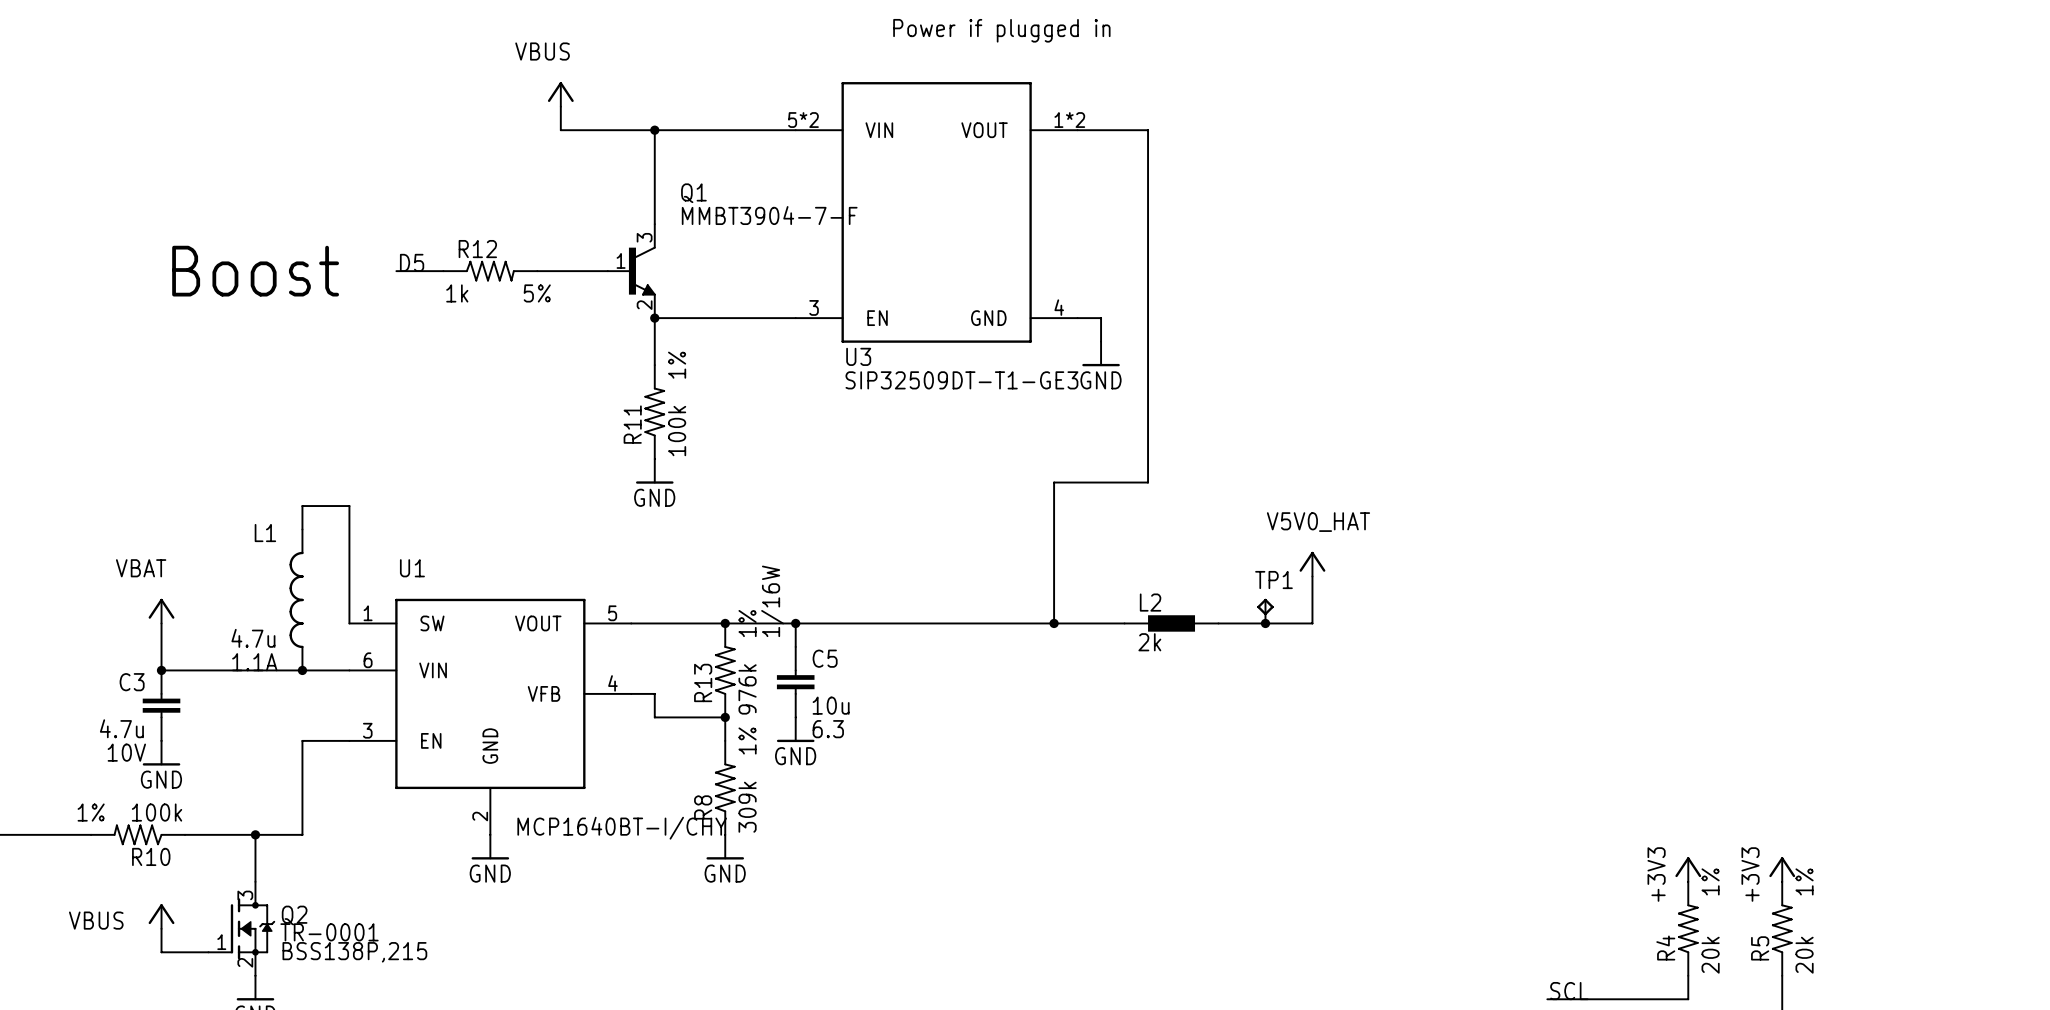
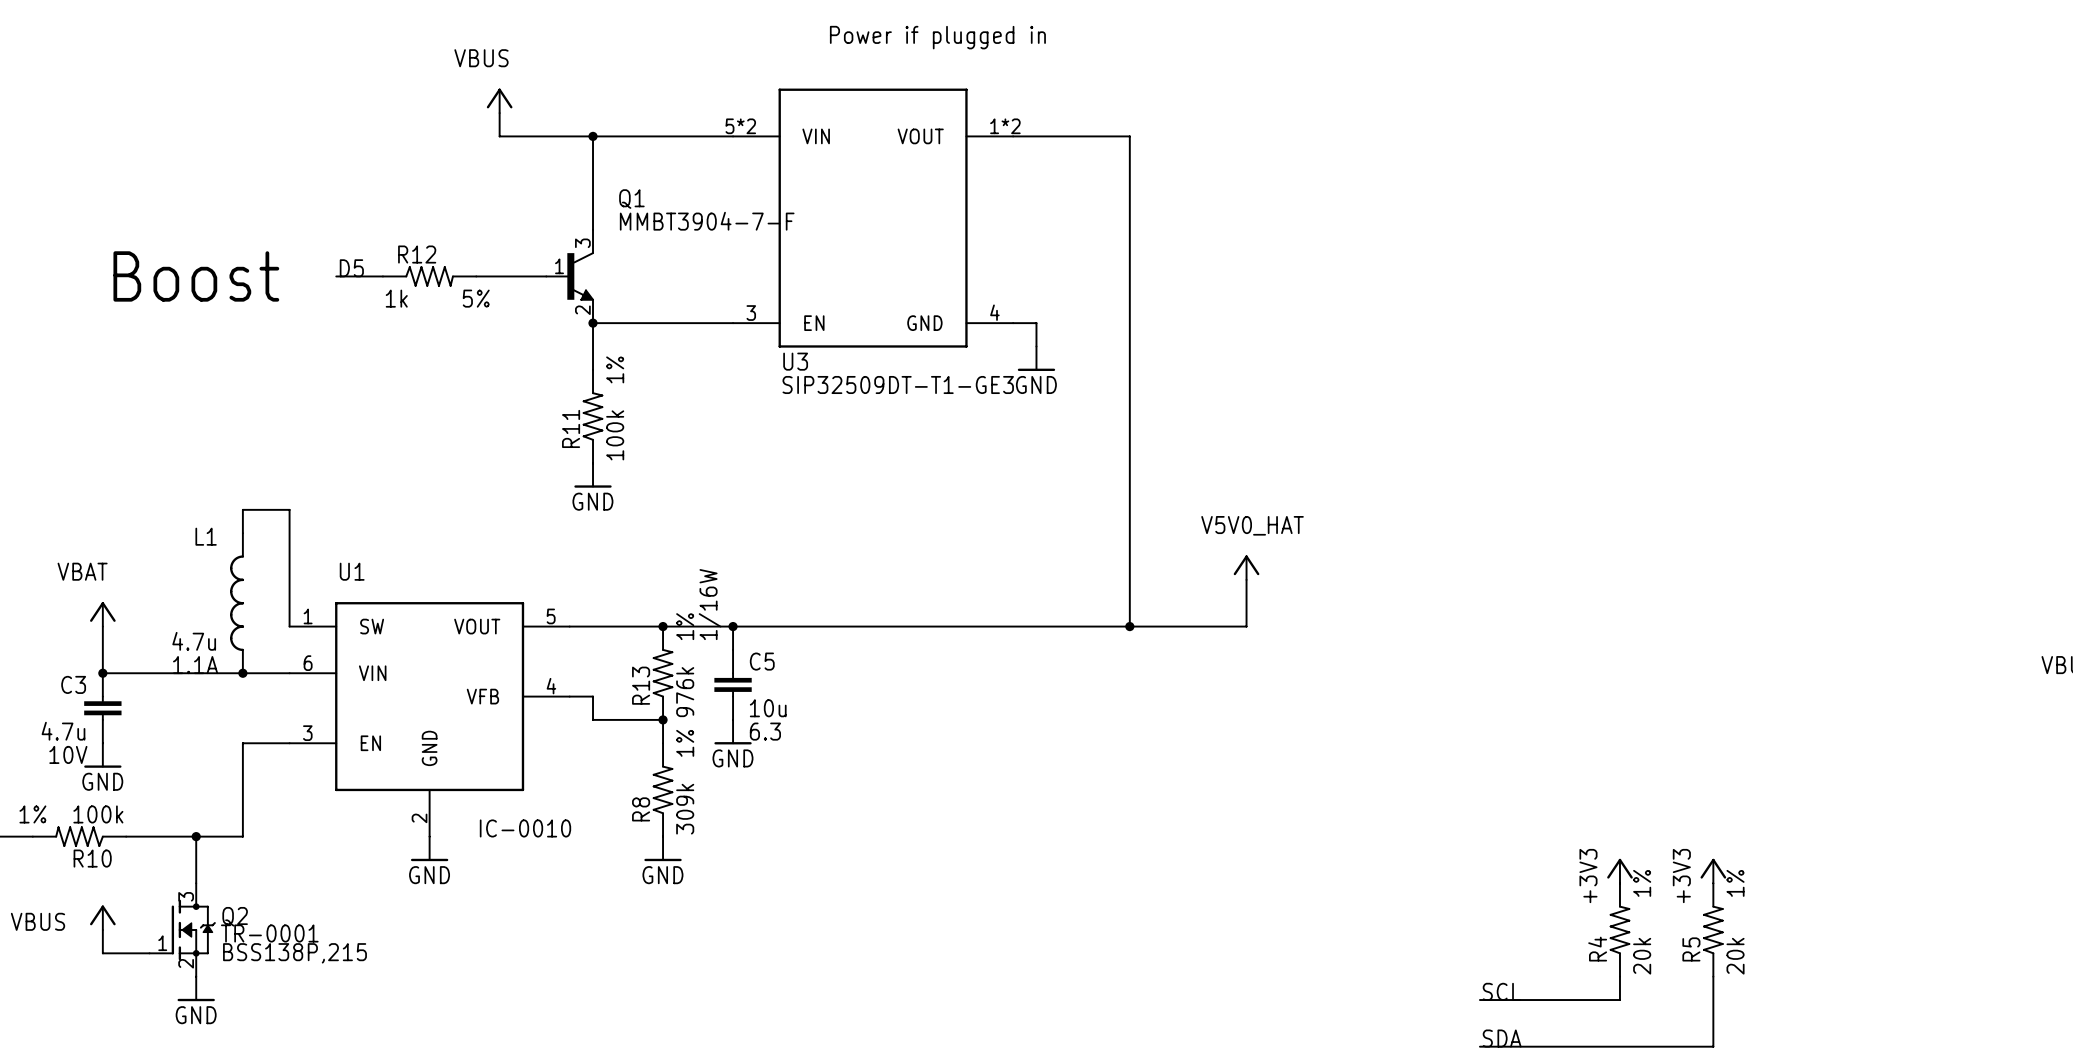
wire: (1148, 130) (1148, 482) (1054, 482) (1054, 623) -> (1083, 136) (1129, 136) (1129, 626)
TP1: (1265, 611) -> none
junction: (1054, 623) -> none
L2: 2k (1171, 623) -> none
junction: none -> (1129, 626)
junction: (1265, 623) -> none
U1 value: none -> IC-0010 (525, 828)
U1 text: MCP1640BT-I/CHY (622, 828) -> none

